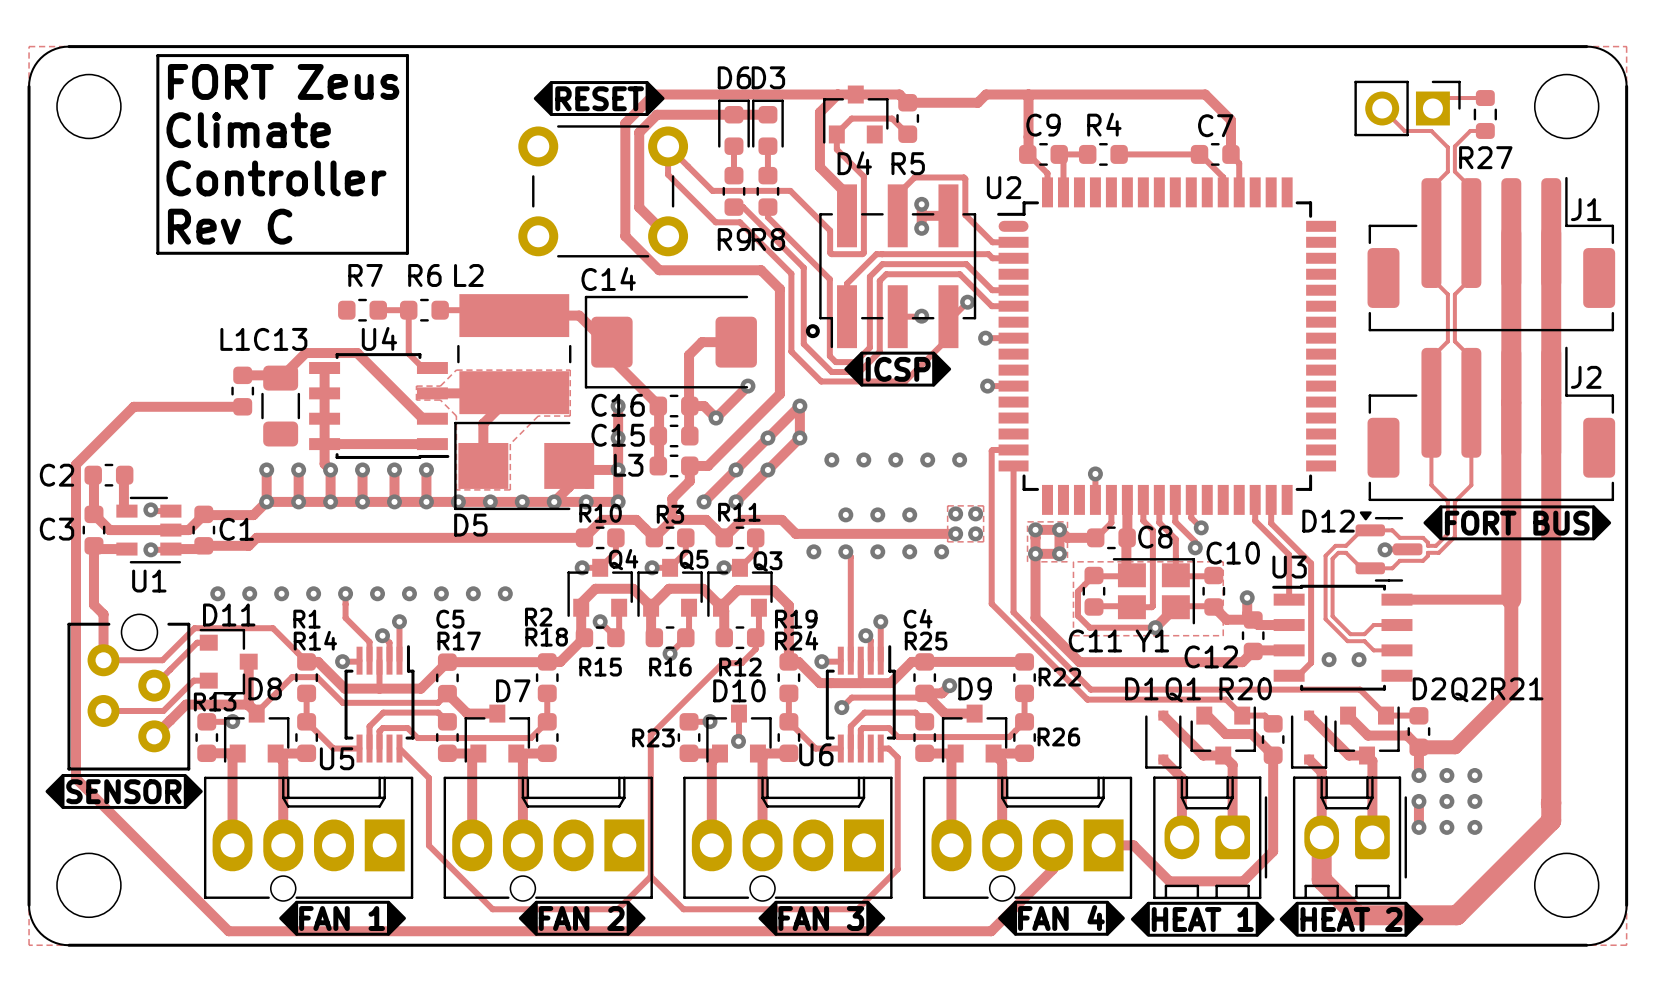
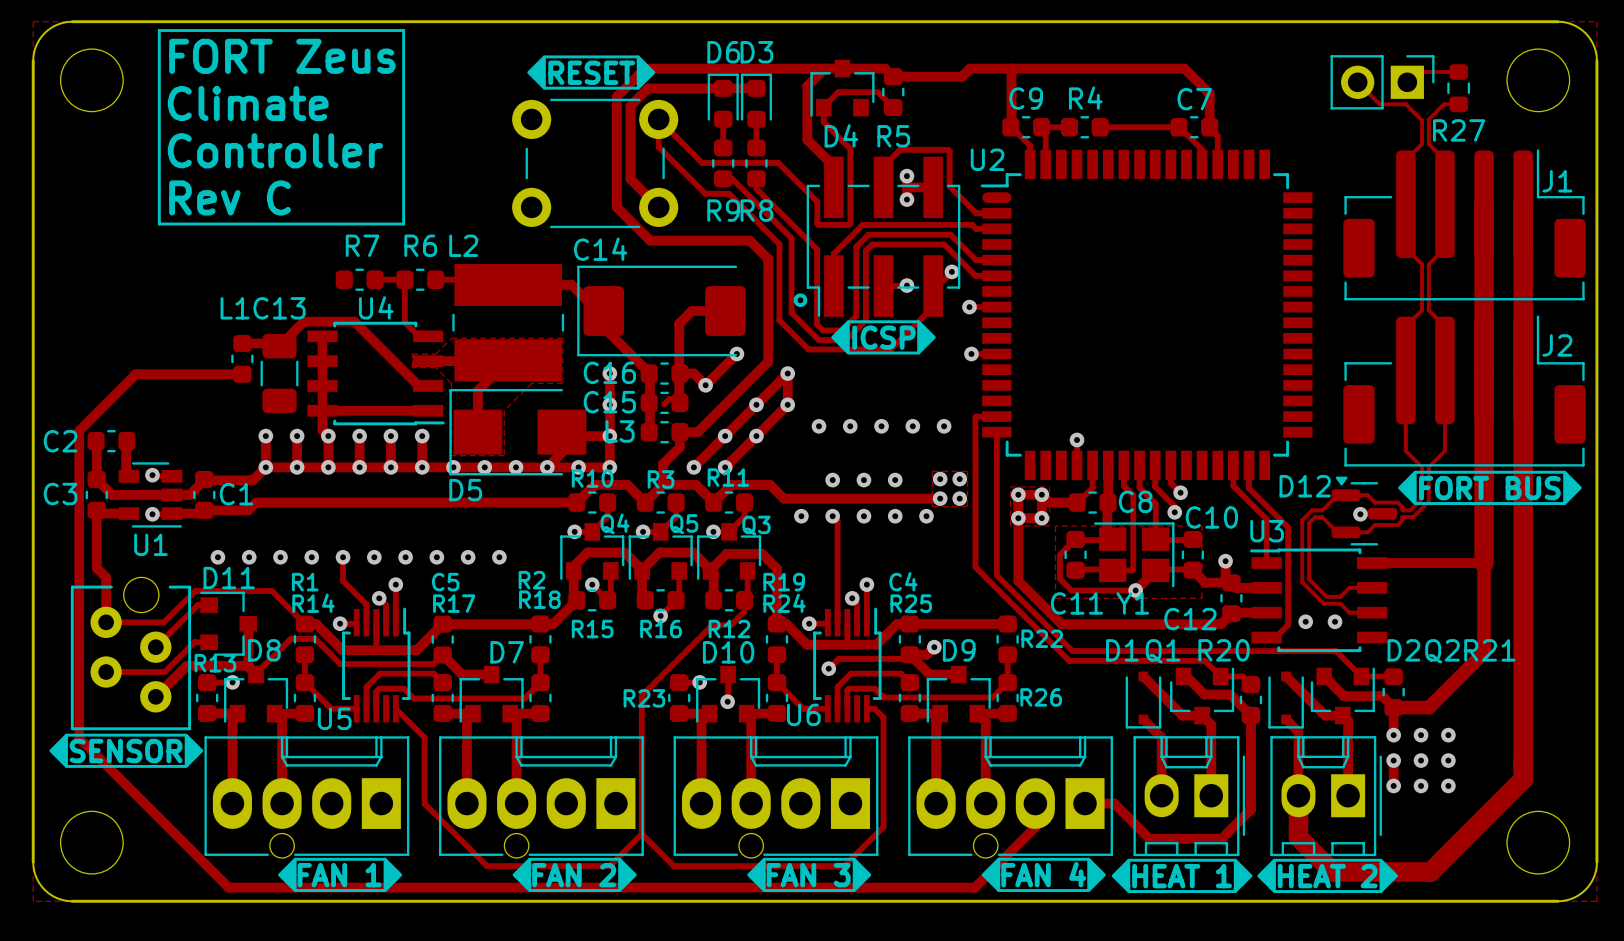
track: none -> (679, 398) (669, 398) (664, 404)
part footprint: [1153, 776, 1268, 900] -> [1133, 736, 1246, 857]
part footprint: [1292, 776, 1407, 900] -> [1270, 736, 1382, 857]

